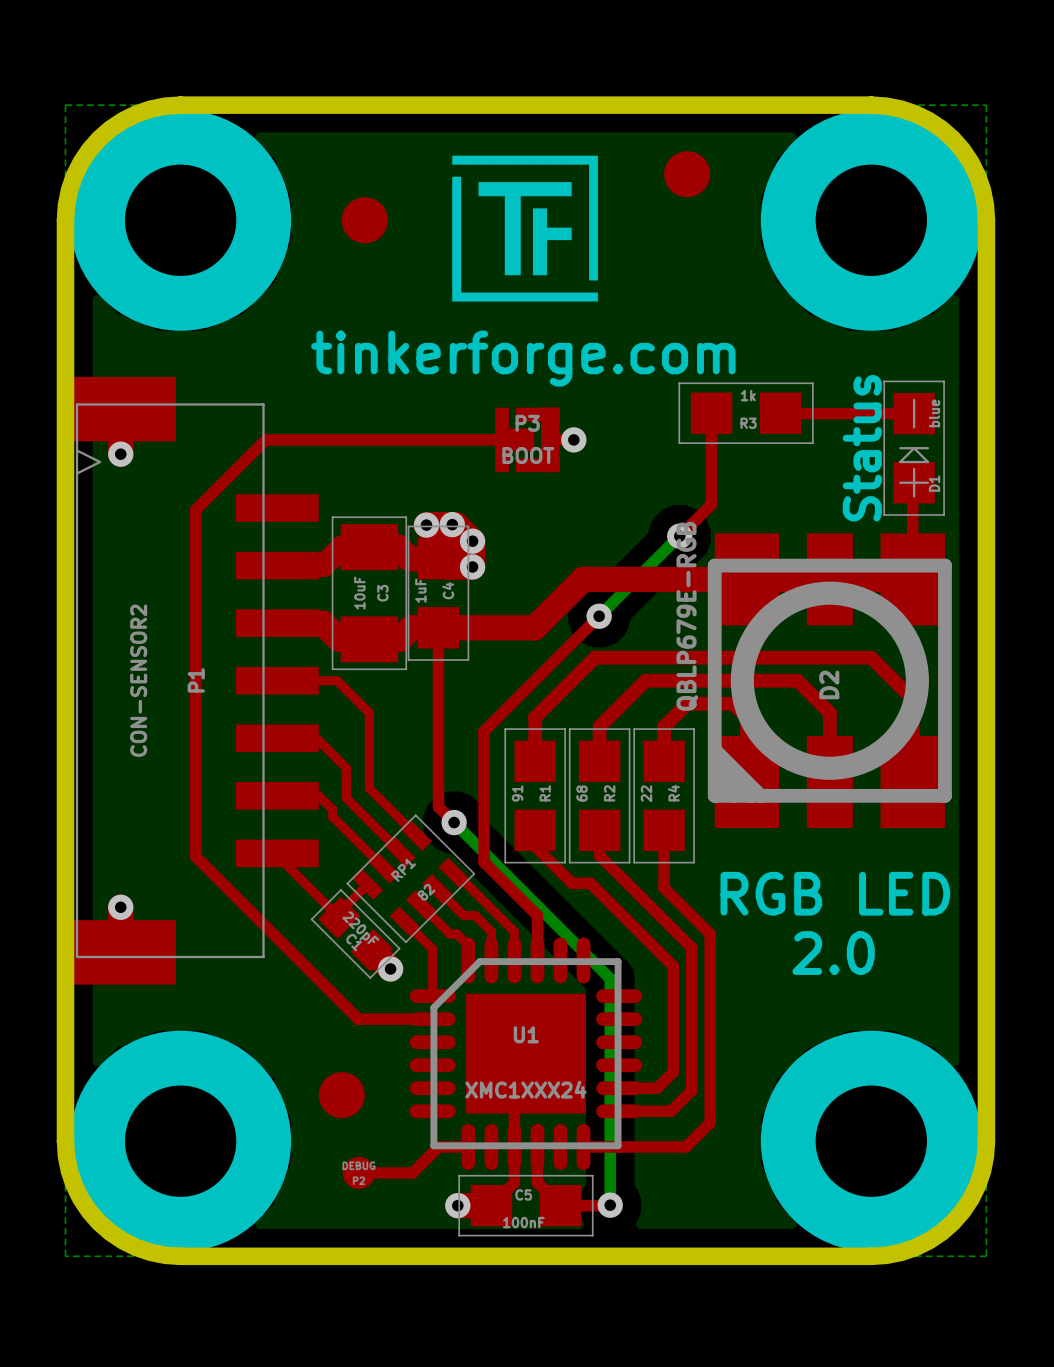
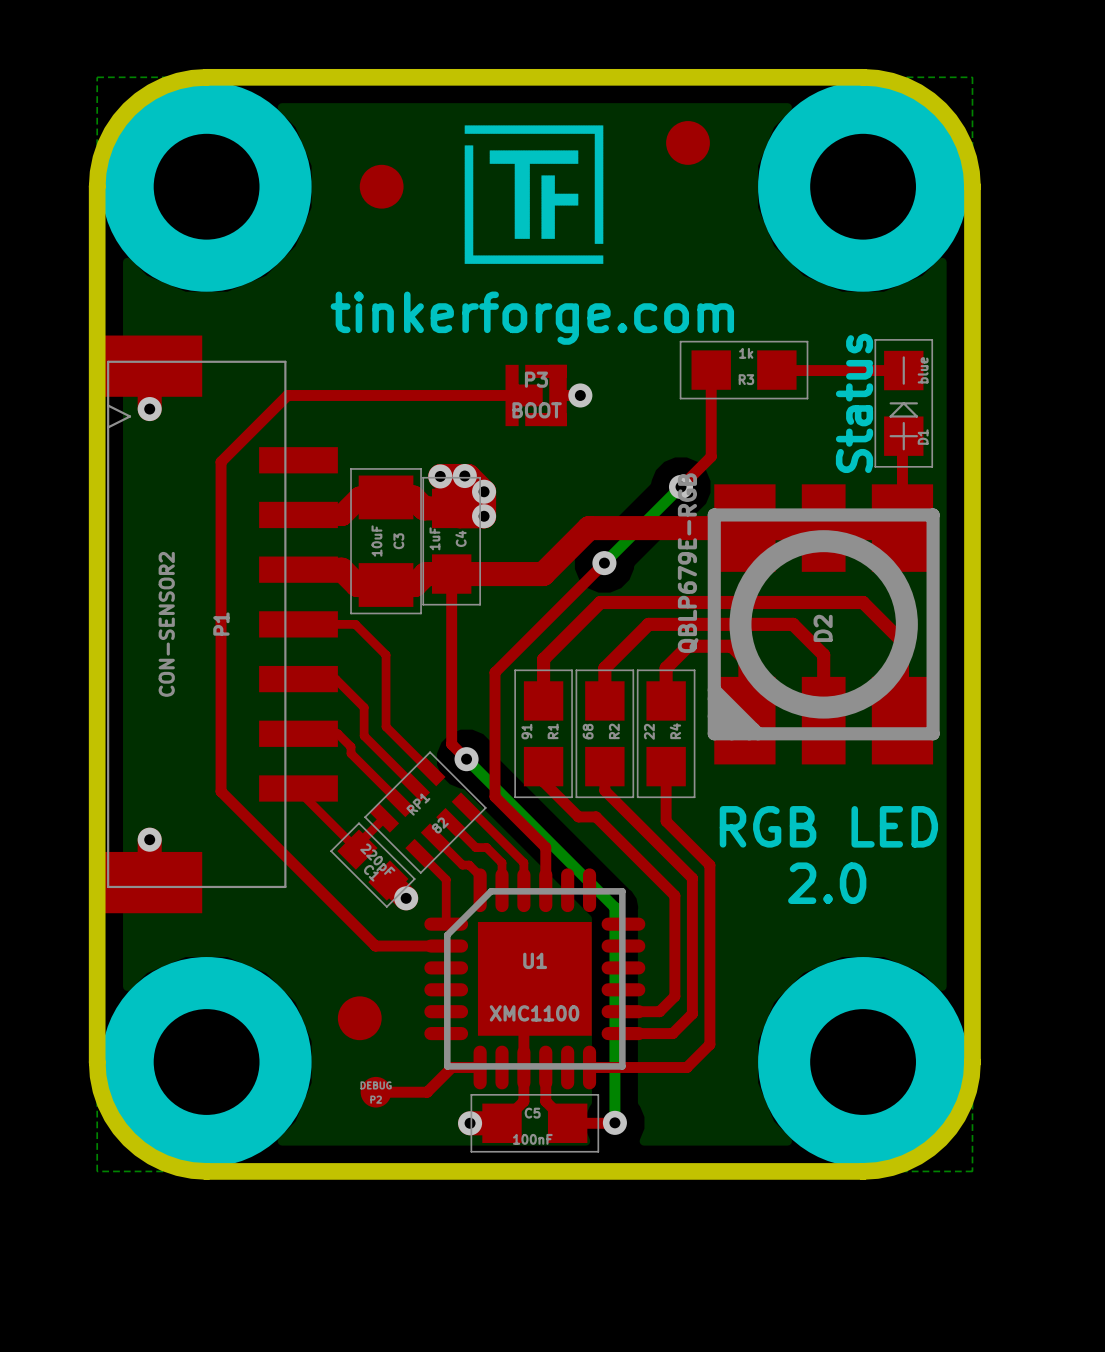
U1 value: XMC1XXX24 (525, 1089) -> XMC1100 (534, 1013)

